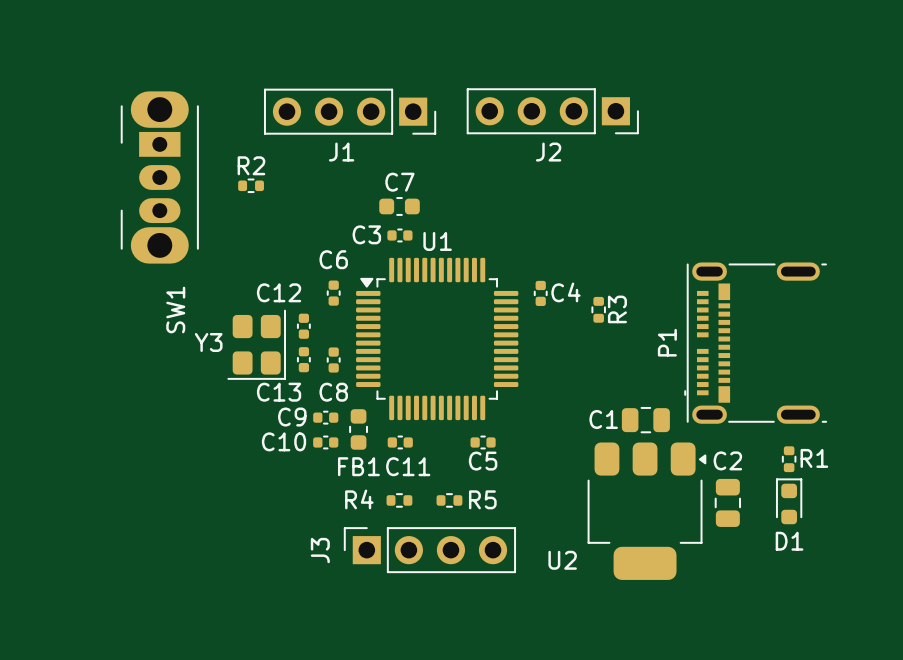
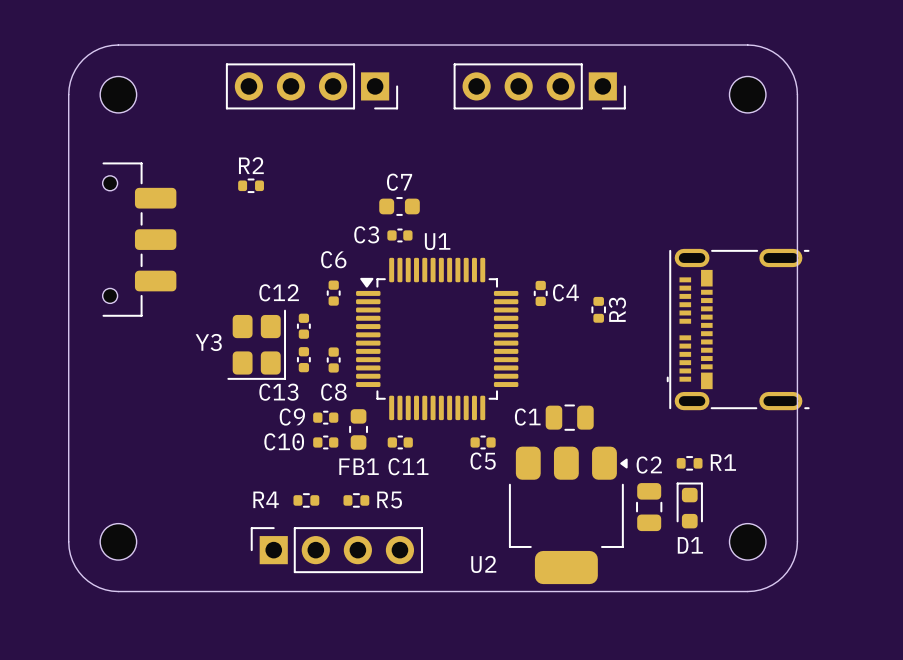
board edge: none -> (118, 45) (747, 45) (760, 46) (777, 55) (790, 69) (795, 81) (797, 94) (797, 541) (795, 554) (787, 572) (777, 581) (766, 587) (747, 591) (118, 591) (99, 587) (88, 581) (78, 572) (72, 560) (68, 541) (68, 94) (72, 75) (83, 59) (99, 48) (118, 45)
part: none -> (312, 86)
part: none -> (539, 86)
part: none -> (118, 94)
part: none -> (747, 94)
J2: (350, 111) -> none
J1: (552, 111) -> none
SW1: (159, 177) -> none
part: none -> (139, 239)
part: none -> (738, 329)
P1: (755, 343) -> none
C1 position: (645, 420) -> (569, 417)
R1 rotation: 0° (789, 459) -> 90° clockwise (689, 463)
R1 position: (789, 459) -> (689, 463)
R4 position: (399, 500) -> (306, 500)
R5 position: (449, 500) -> (356, 500)
D1 position: (789, 501) -> (689, 505)
C2 position: (727, 502) -> (649, 507)
U2 position: (646, 511) -> (568, 515)
part: none -> (118, 541)
part: none -> (747, 541)
part: none -> (336, 550)
J3: (429, 550) -> none

